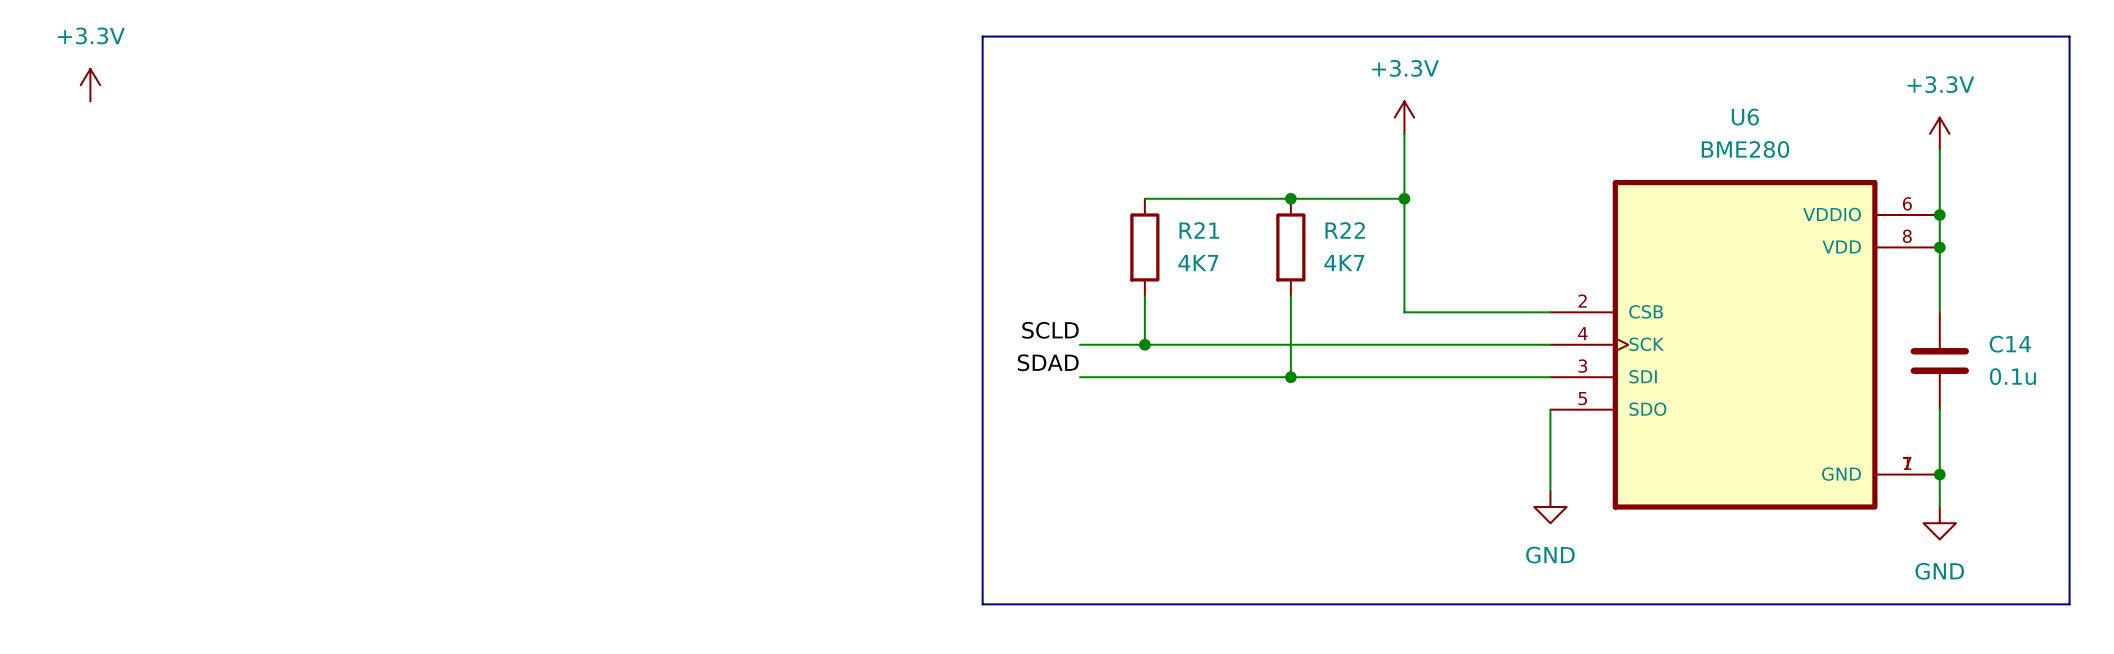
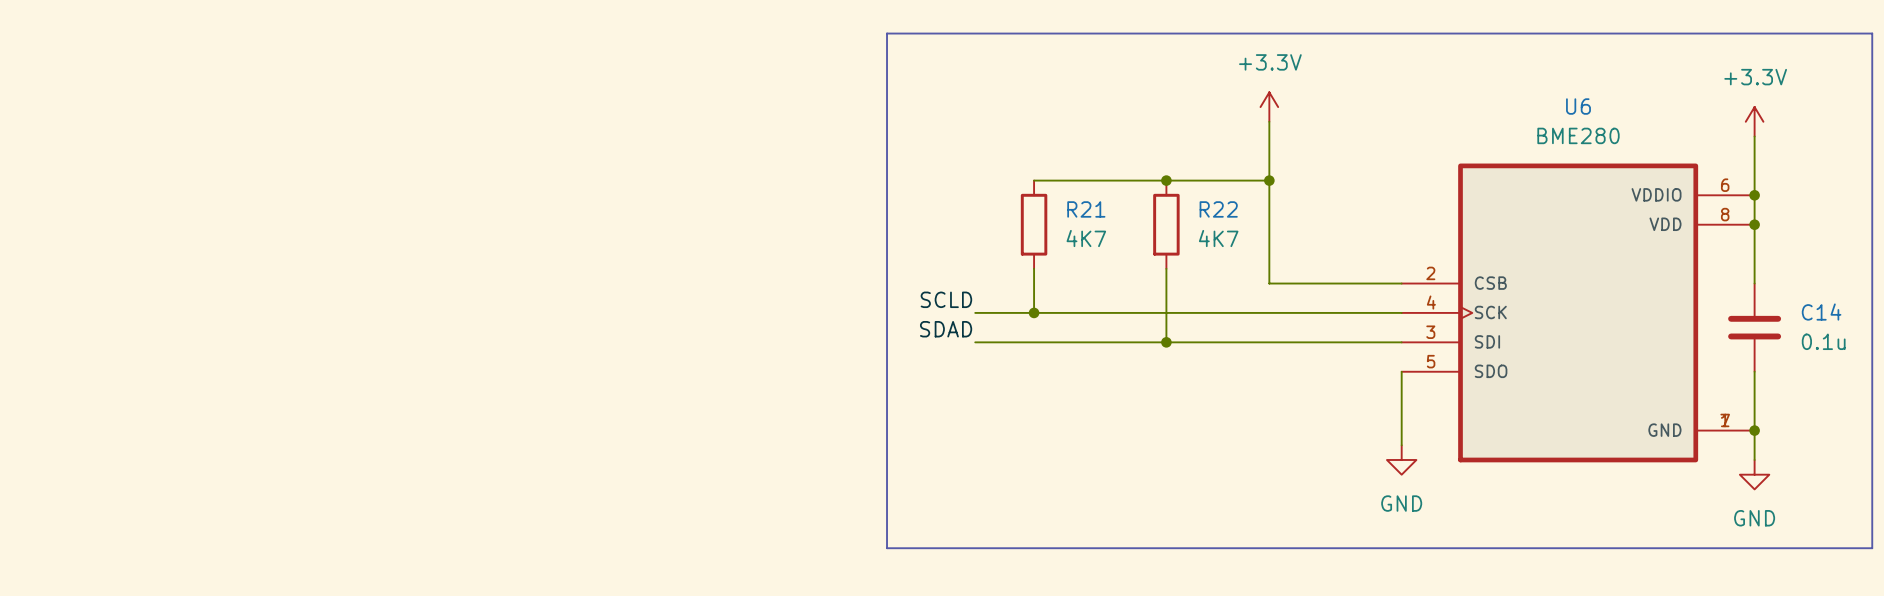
power symbol: +3.3V (90, 85) -> none

